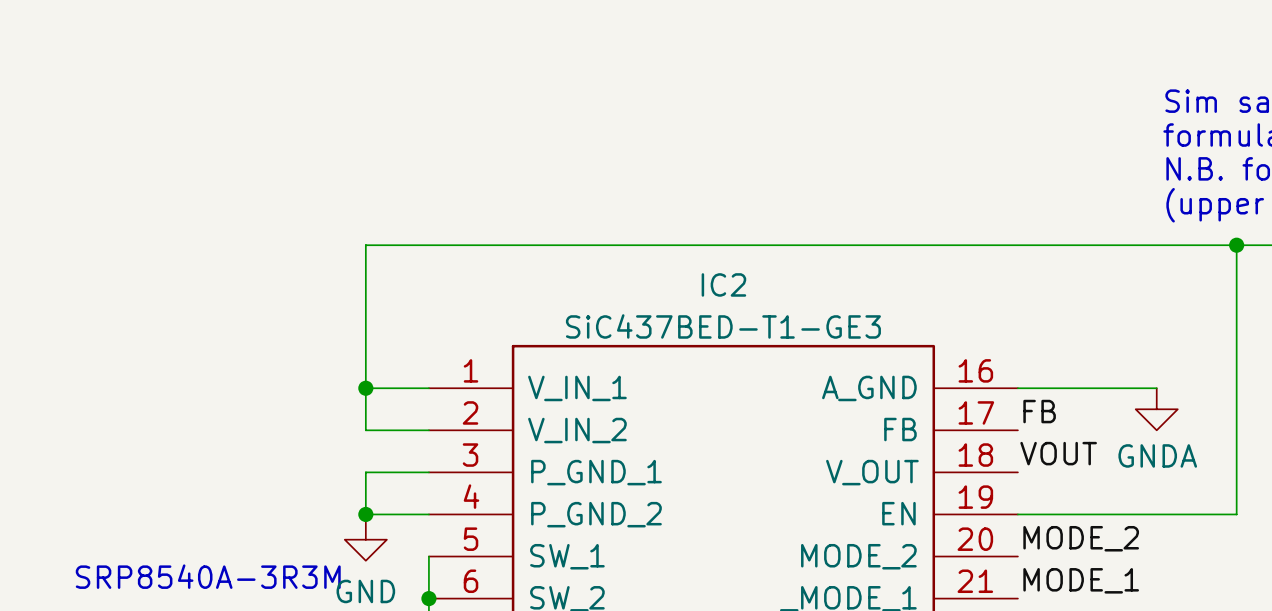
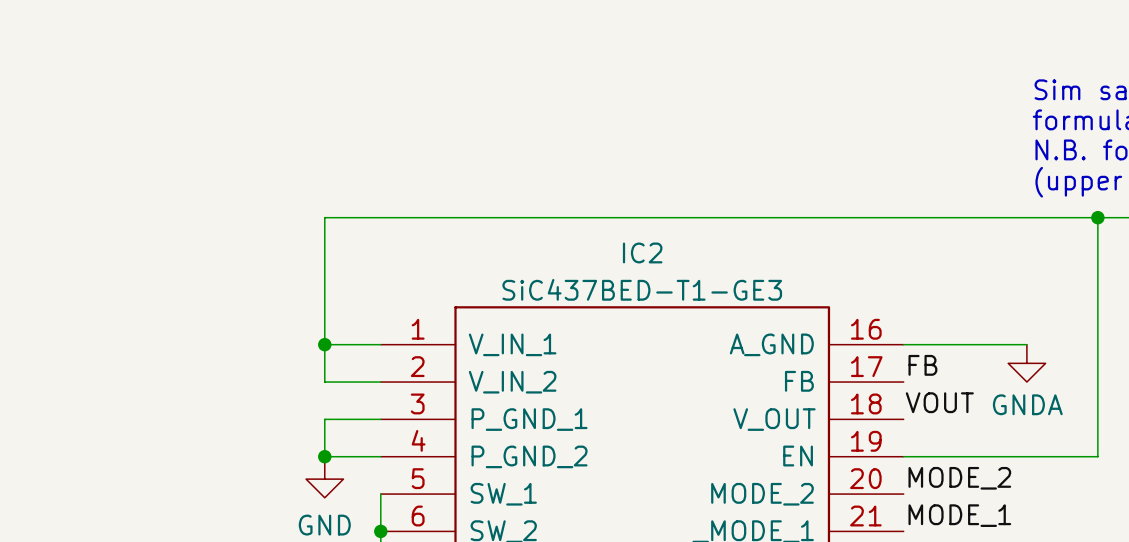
text: SRP8540A-3R3M (208, 576) -> none

